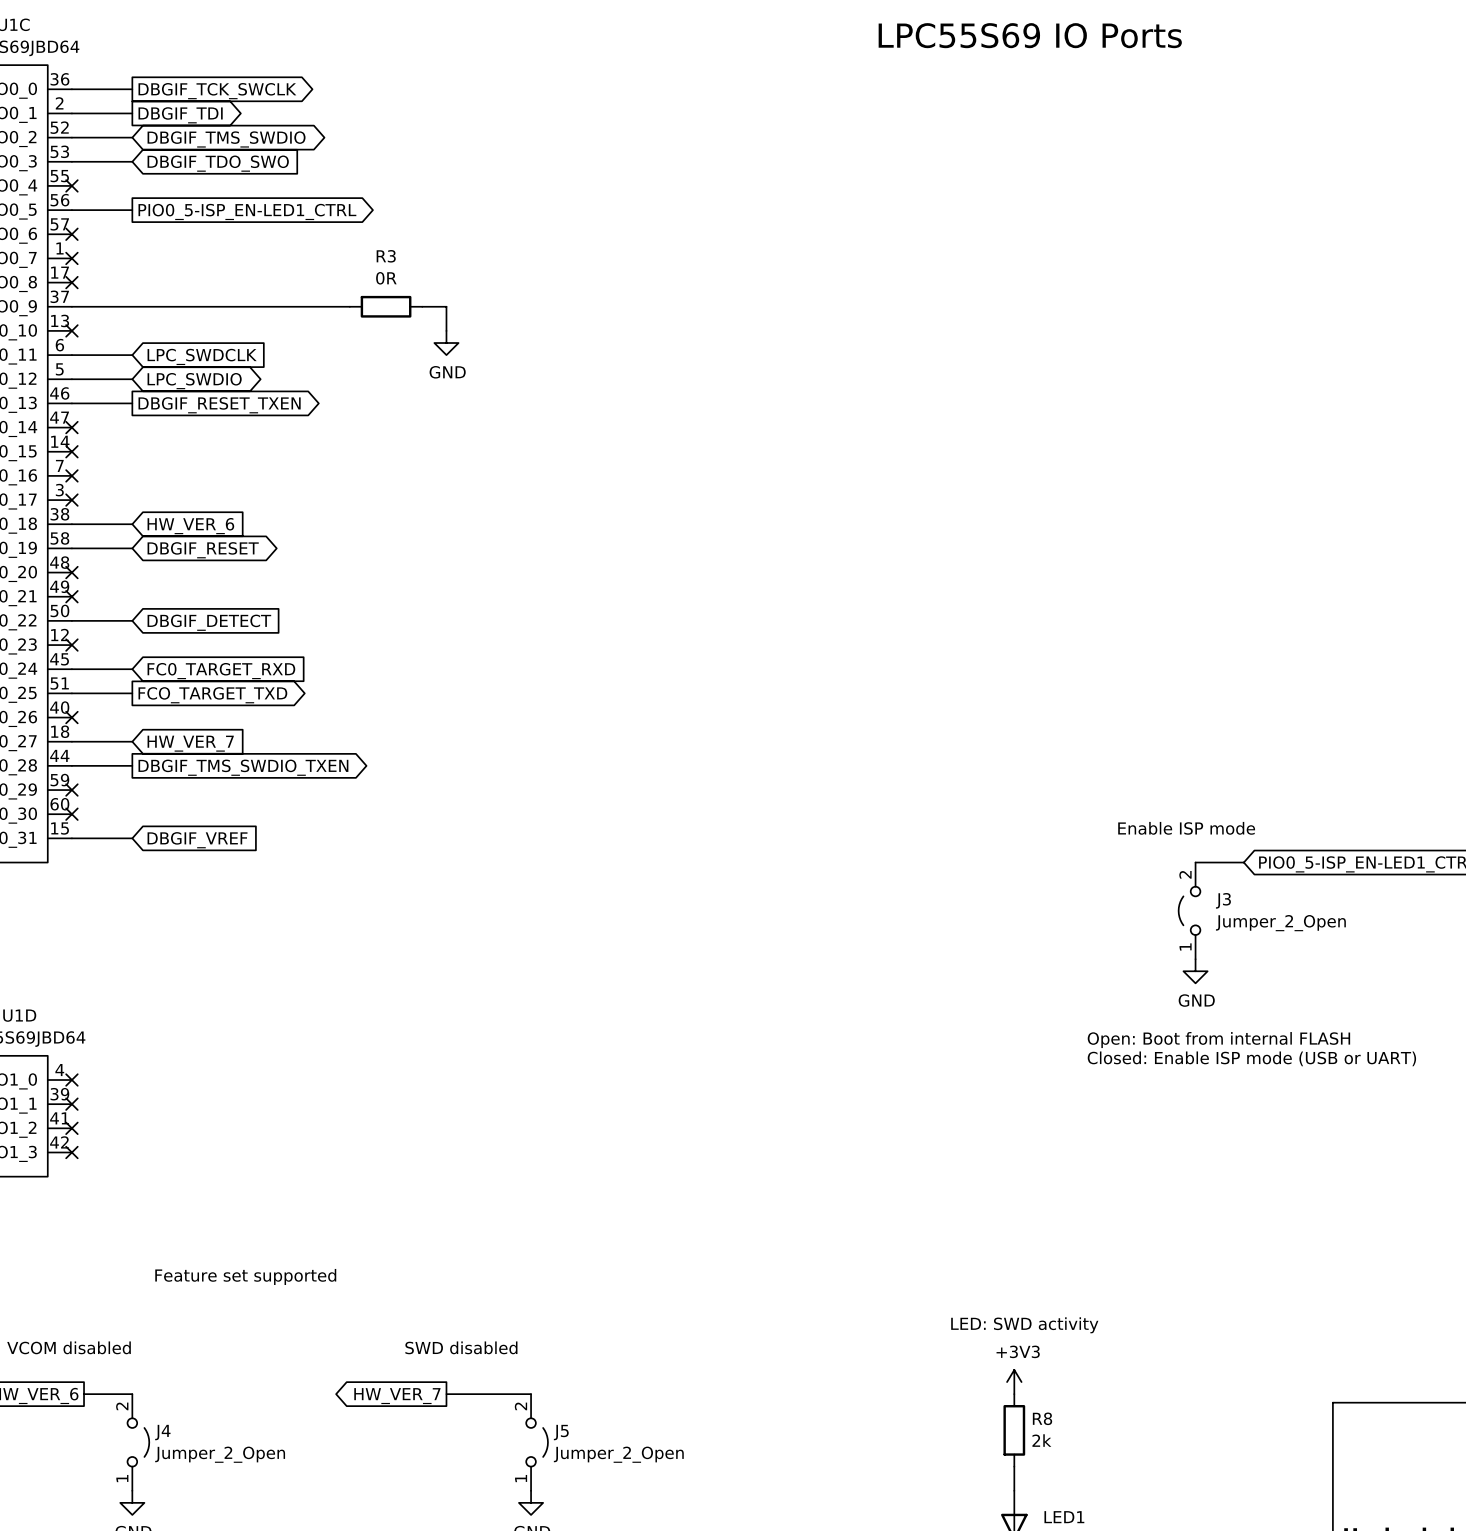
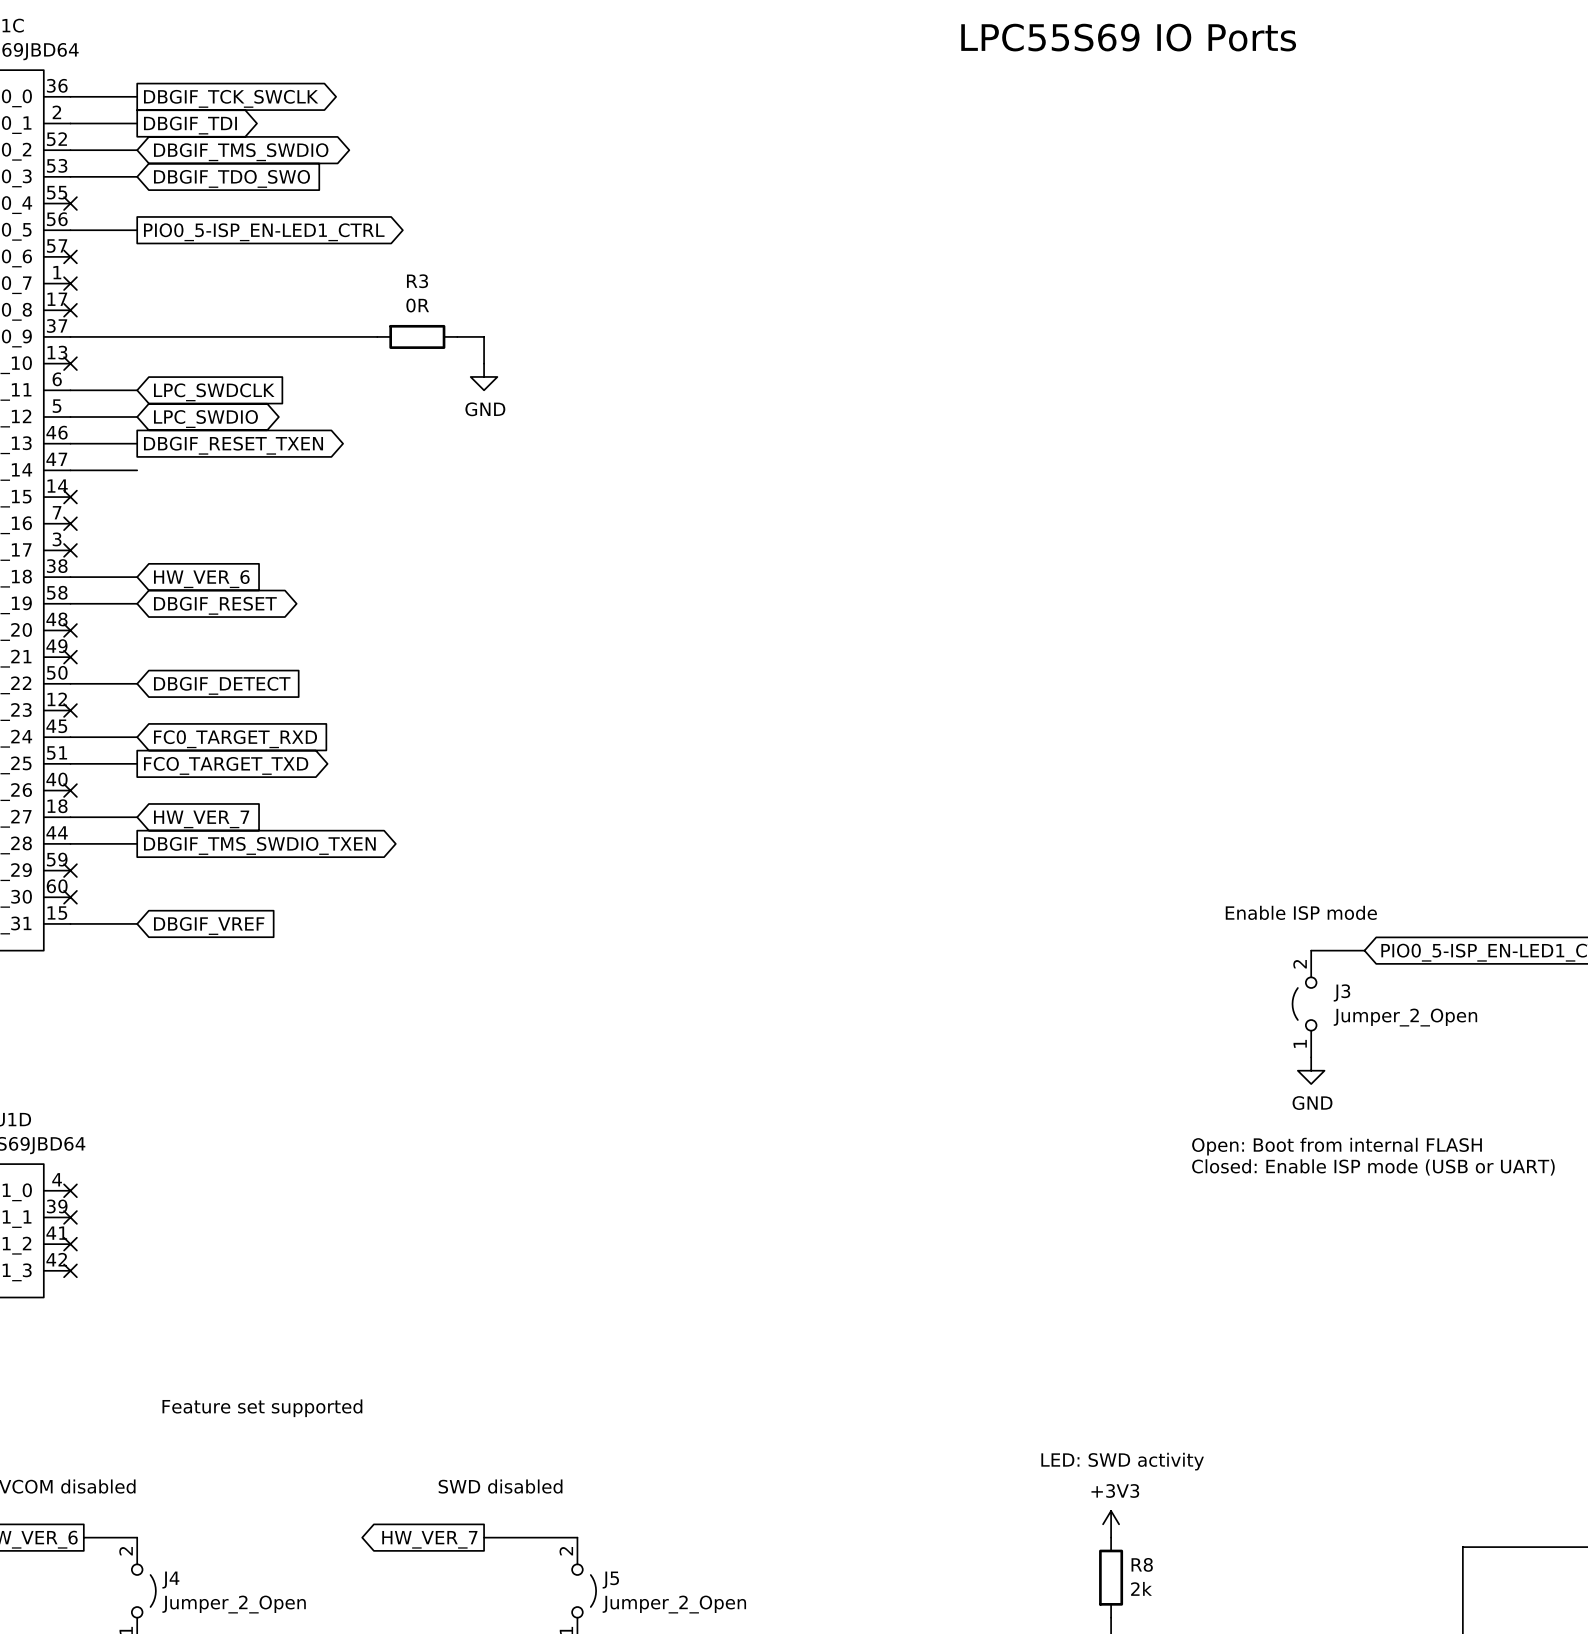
wire: none -> (70, 470) (137, 470)
no-connect mark: (71, 427) -> none

